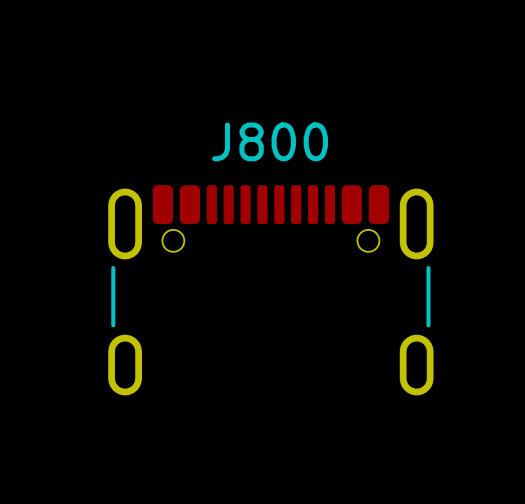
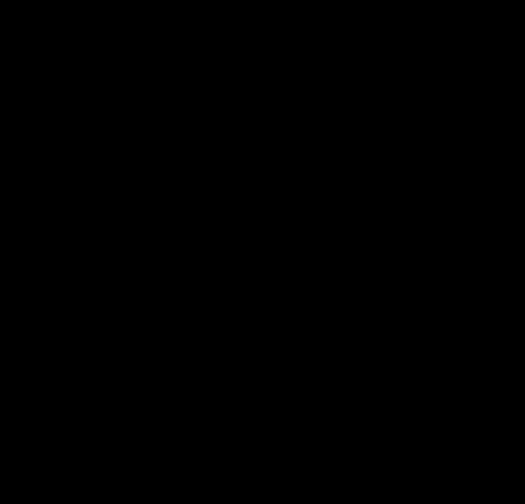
J800: (270, 290) -> none

